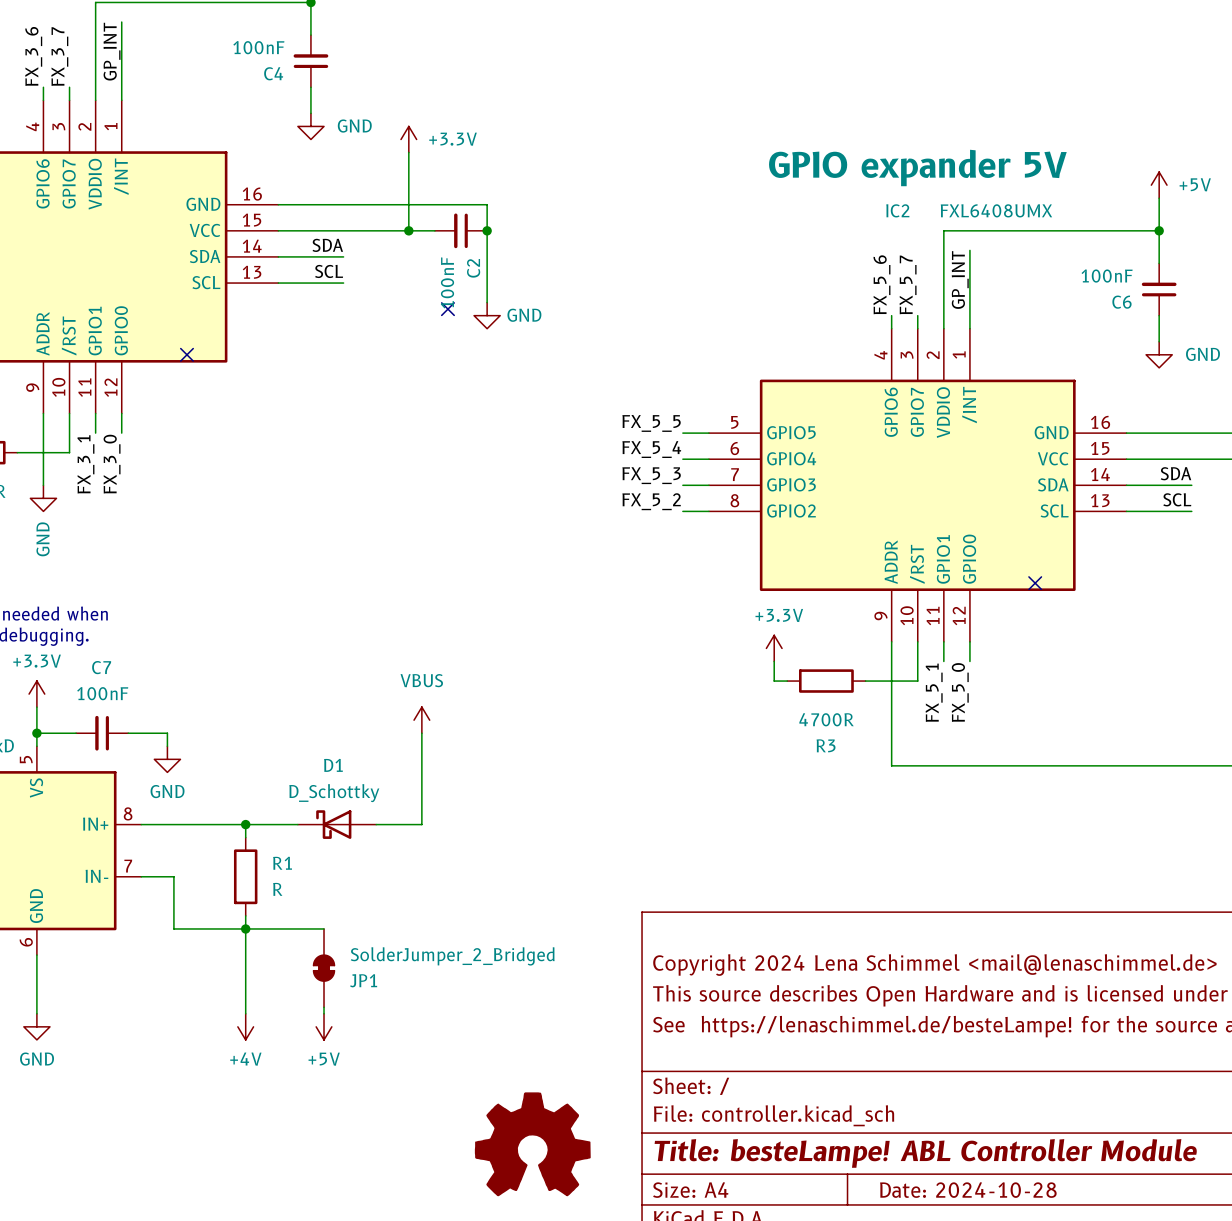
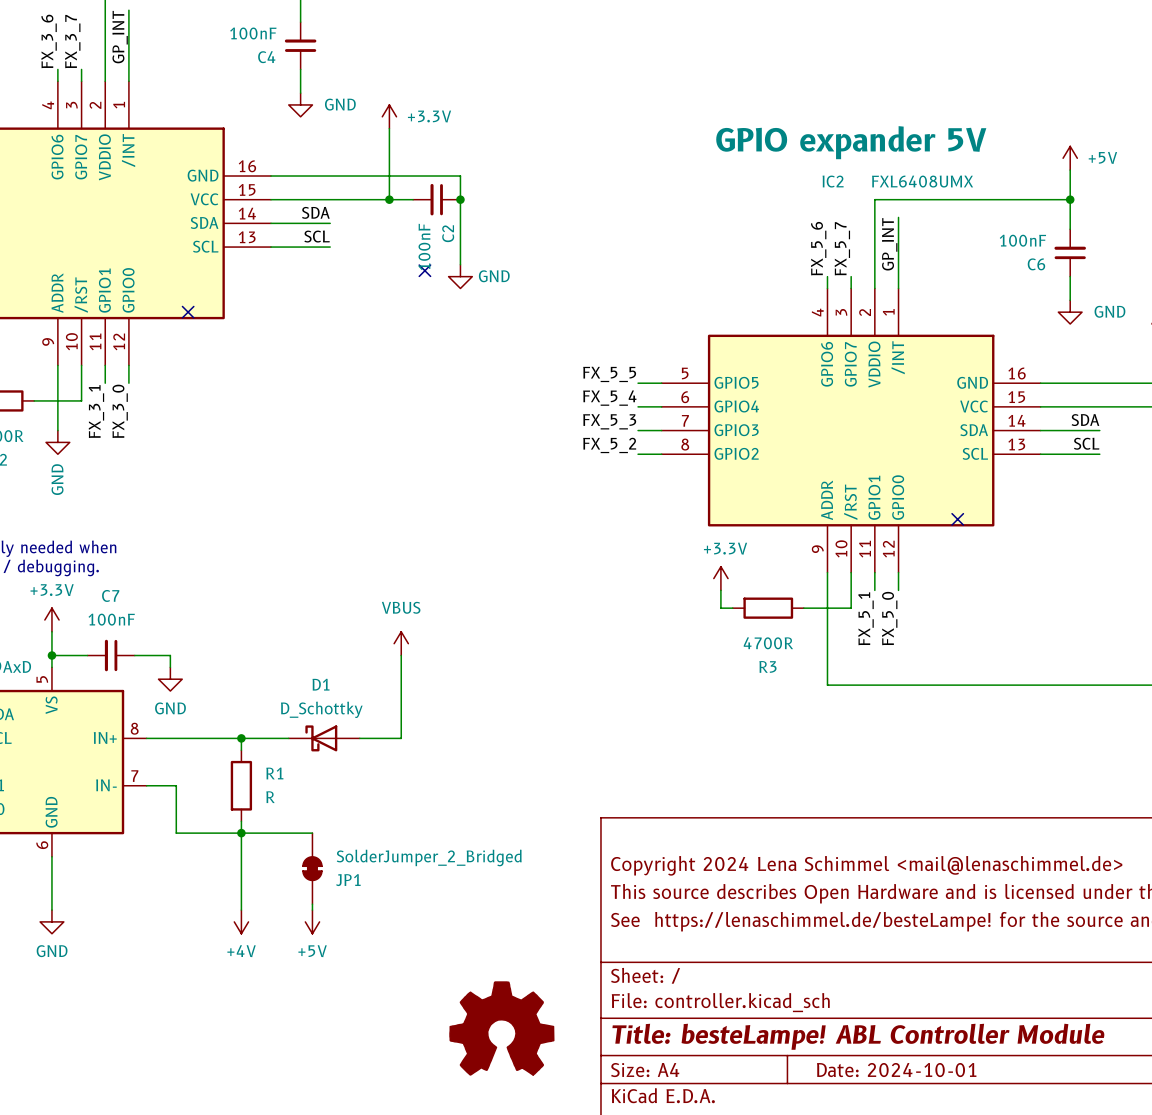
title block: Date: 2024-10-28 (968, 1190) -> Date: 2024-10-01 (896, 1070)

